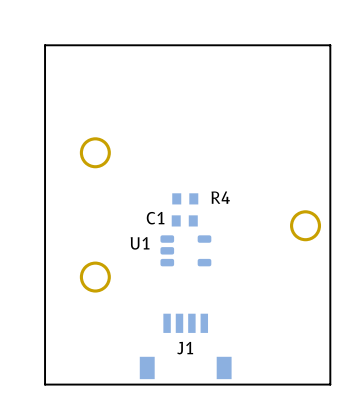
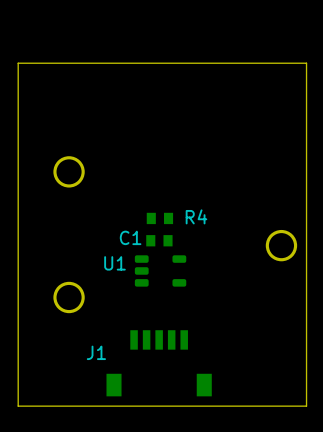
J1 footprint: [139, 313, 232, 380] -> [106, 330, 212, 397]
J1 name position: J1 (185, 348) -> J1 (96, 352)

